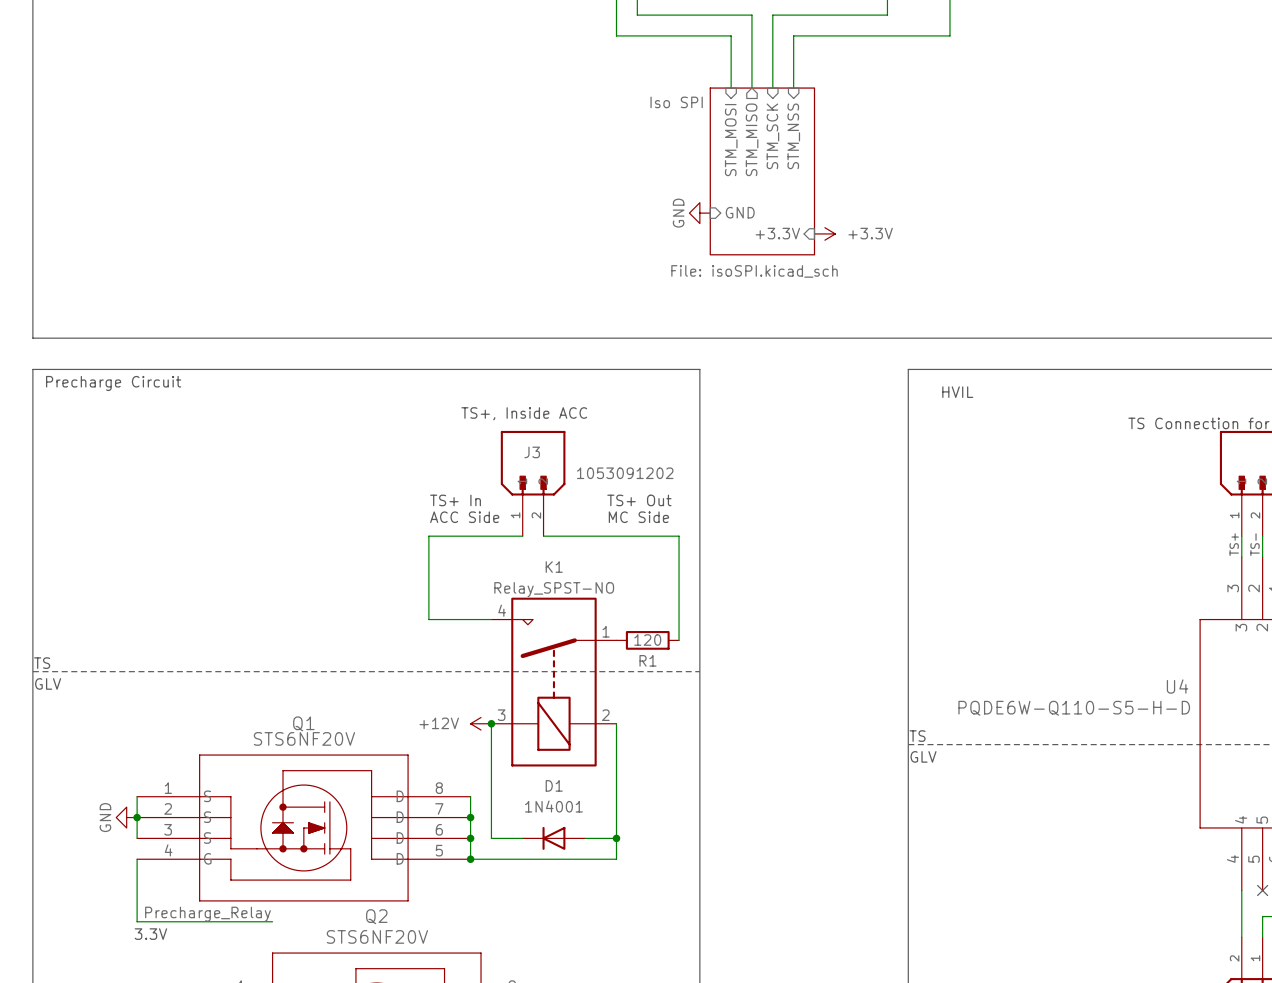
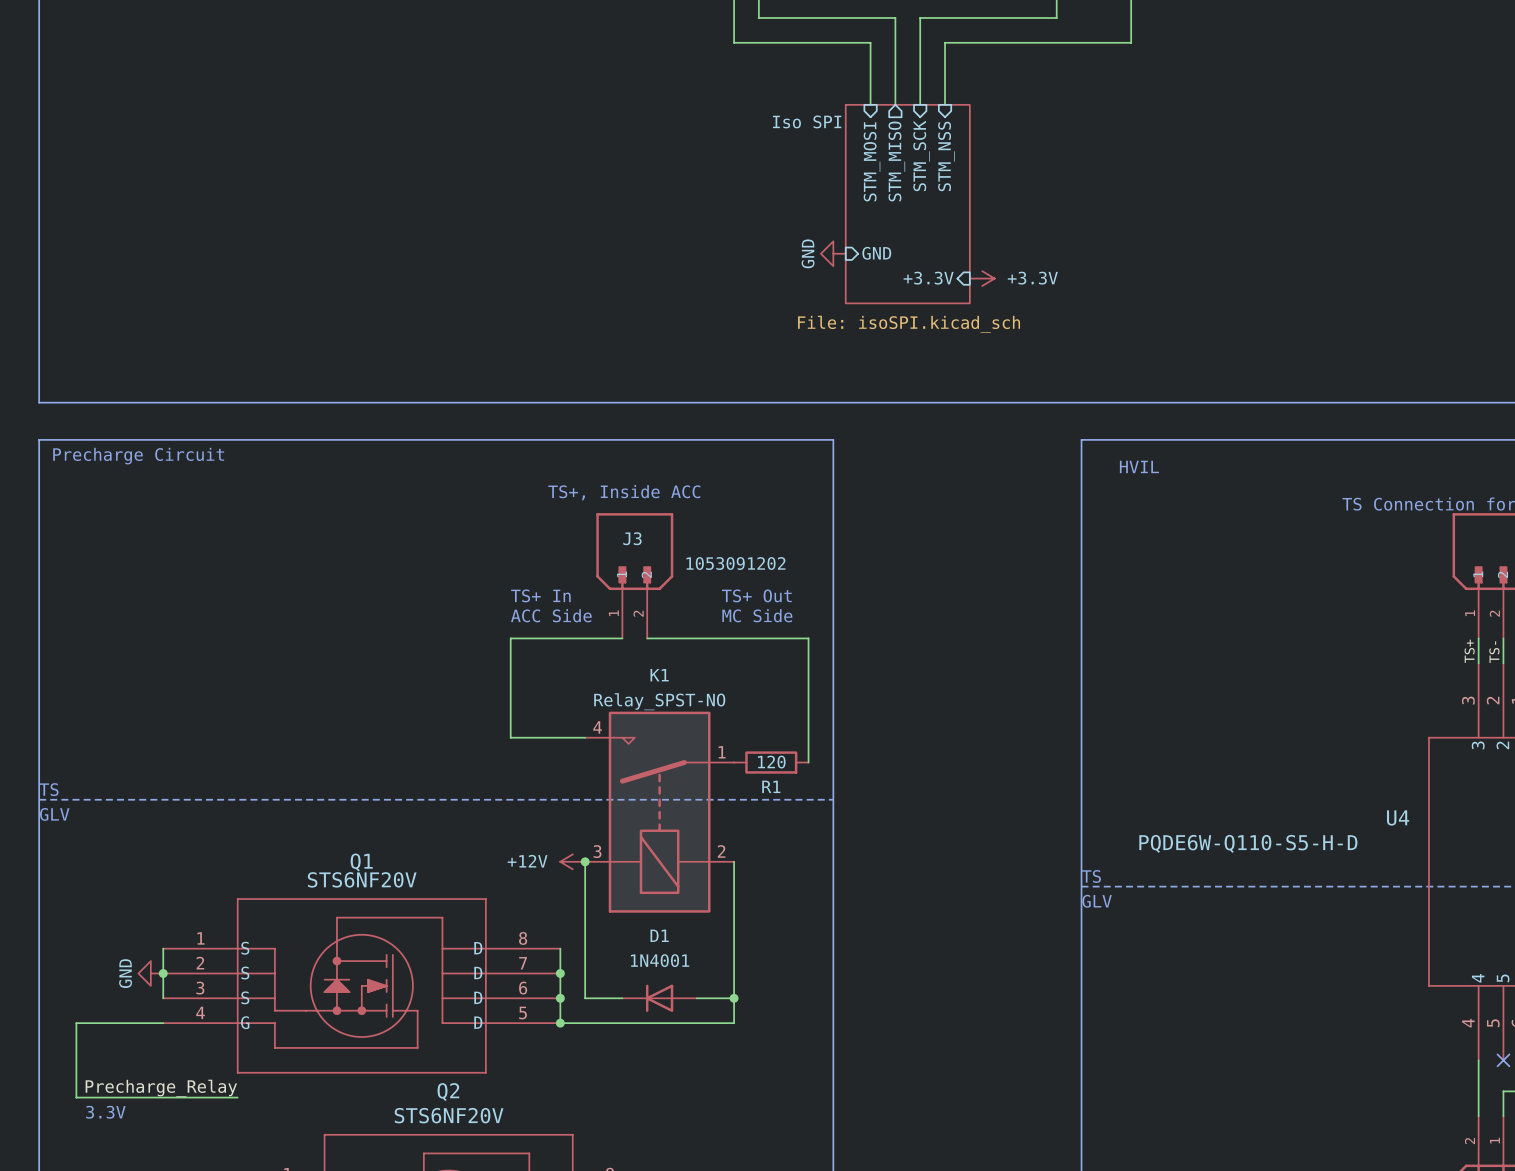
wire: (137, 859) (137, 921) -> (163, 1023) (76, 1023) (76, 1097) (163, 1097)
label position: Precharge_Relay (207, 914) -> Precharge_Relay (161, 1088)
wire: (199, 921) (272, 921) -> none
text position: 3.3V (150, 934) -> 3.3V (105, 1112)

